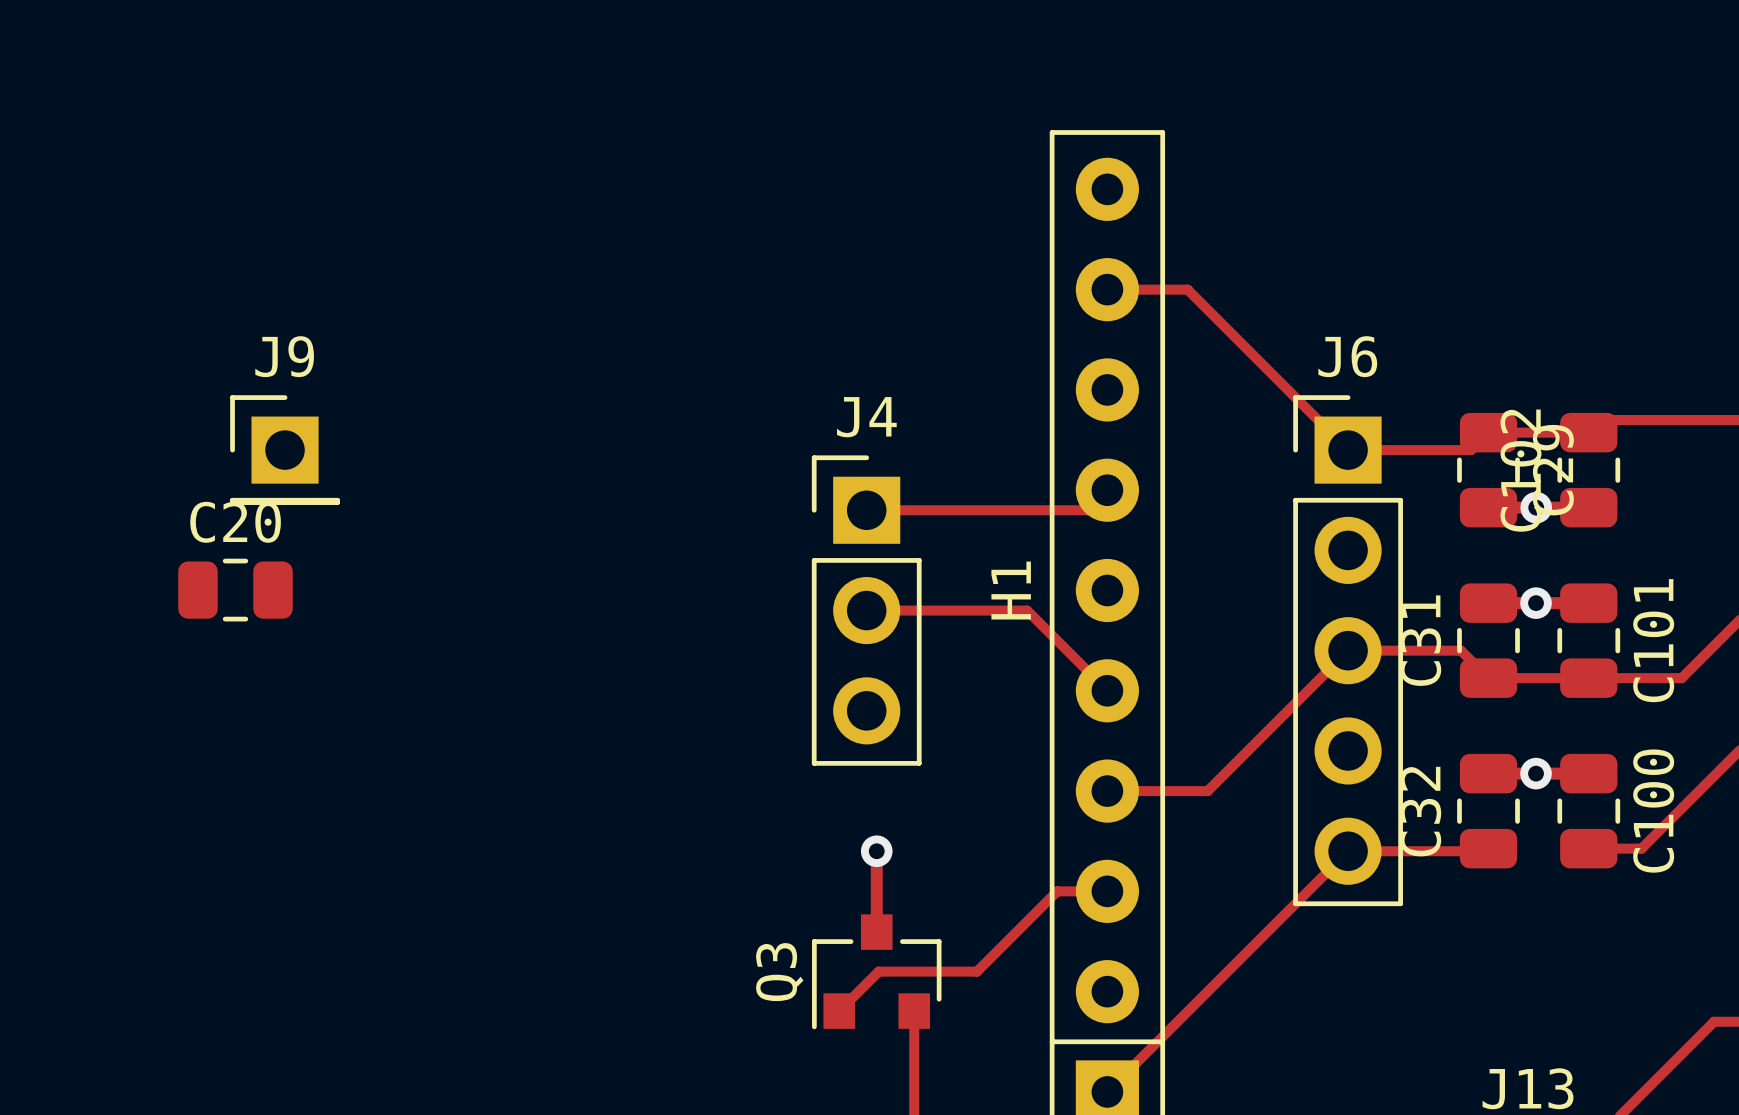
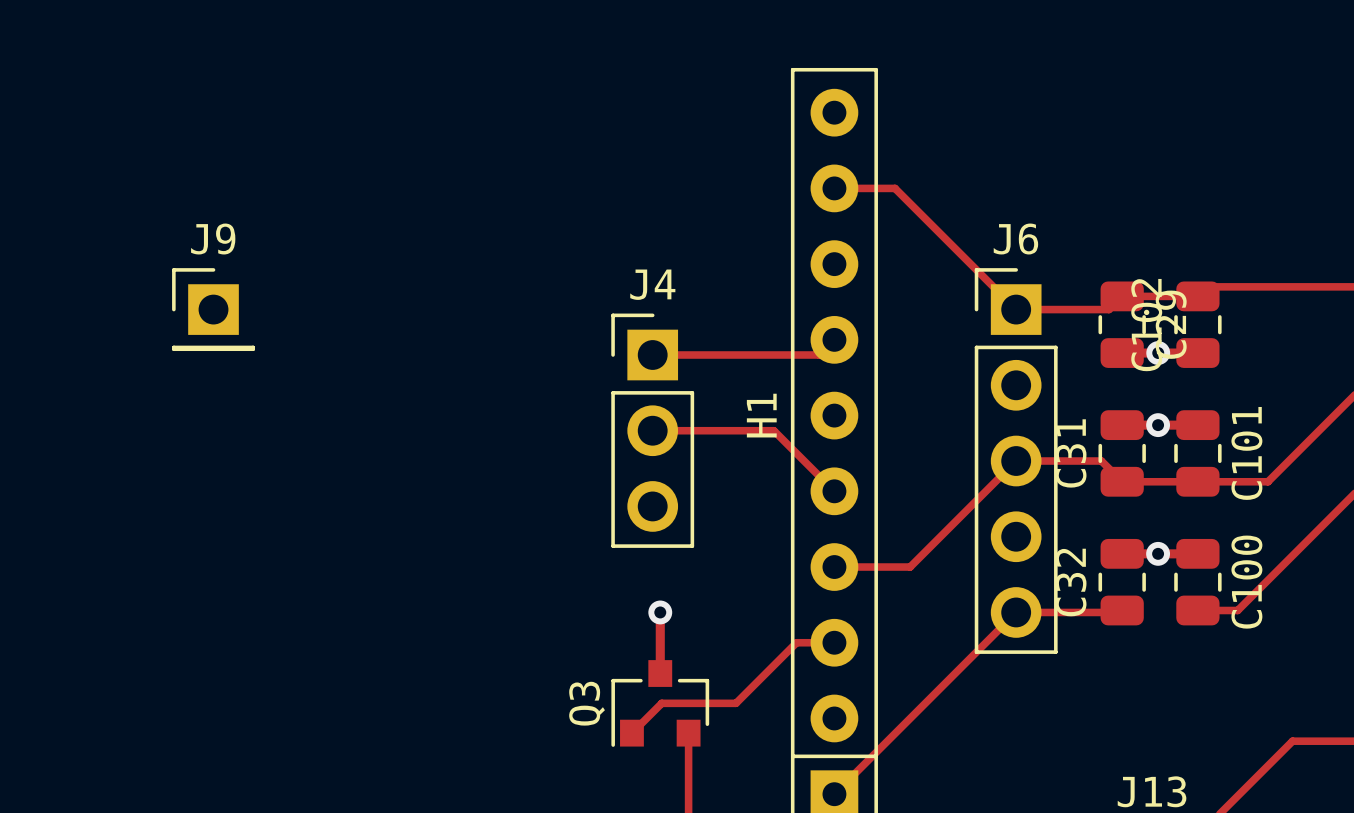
C20: (235, 590) -> none

